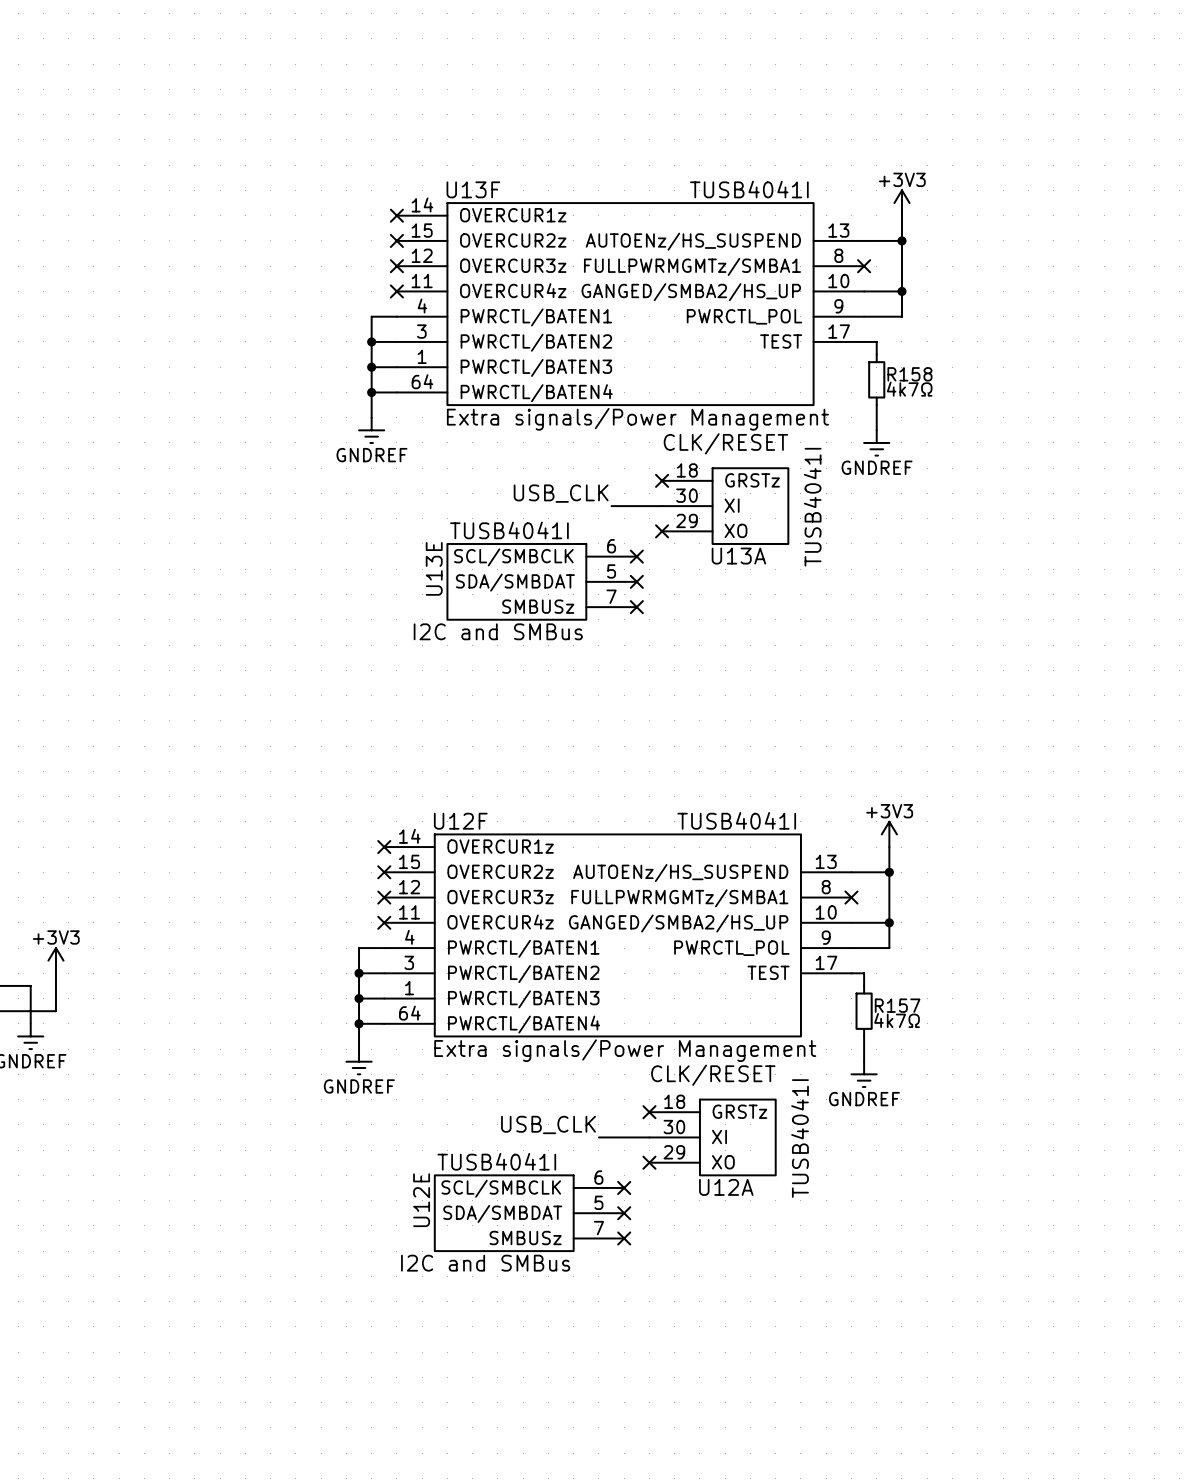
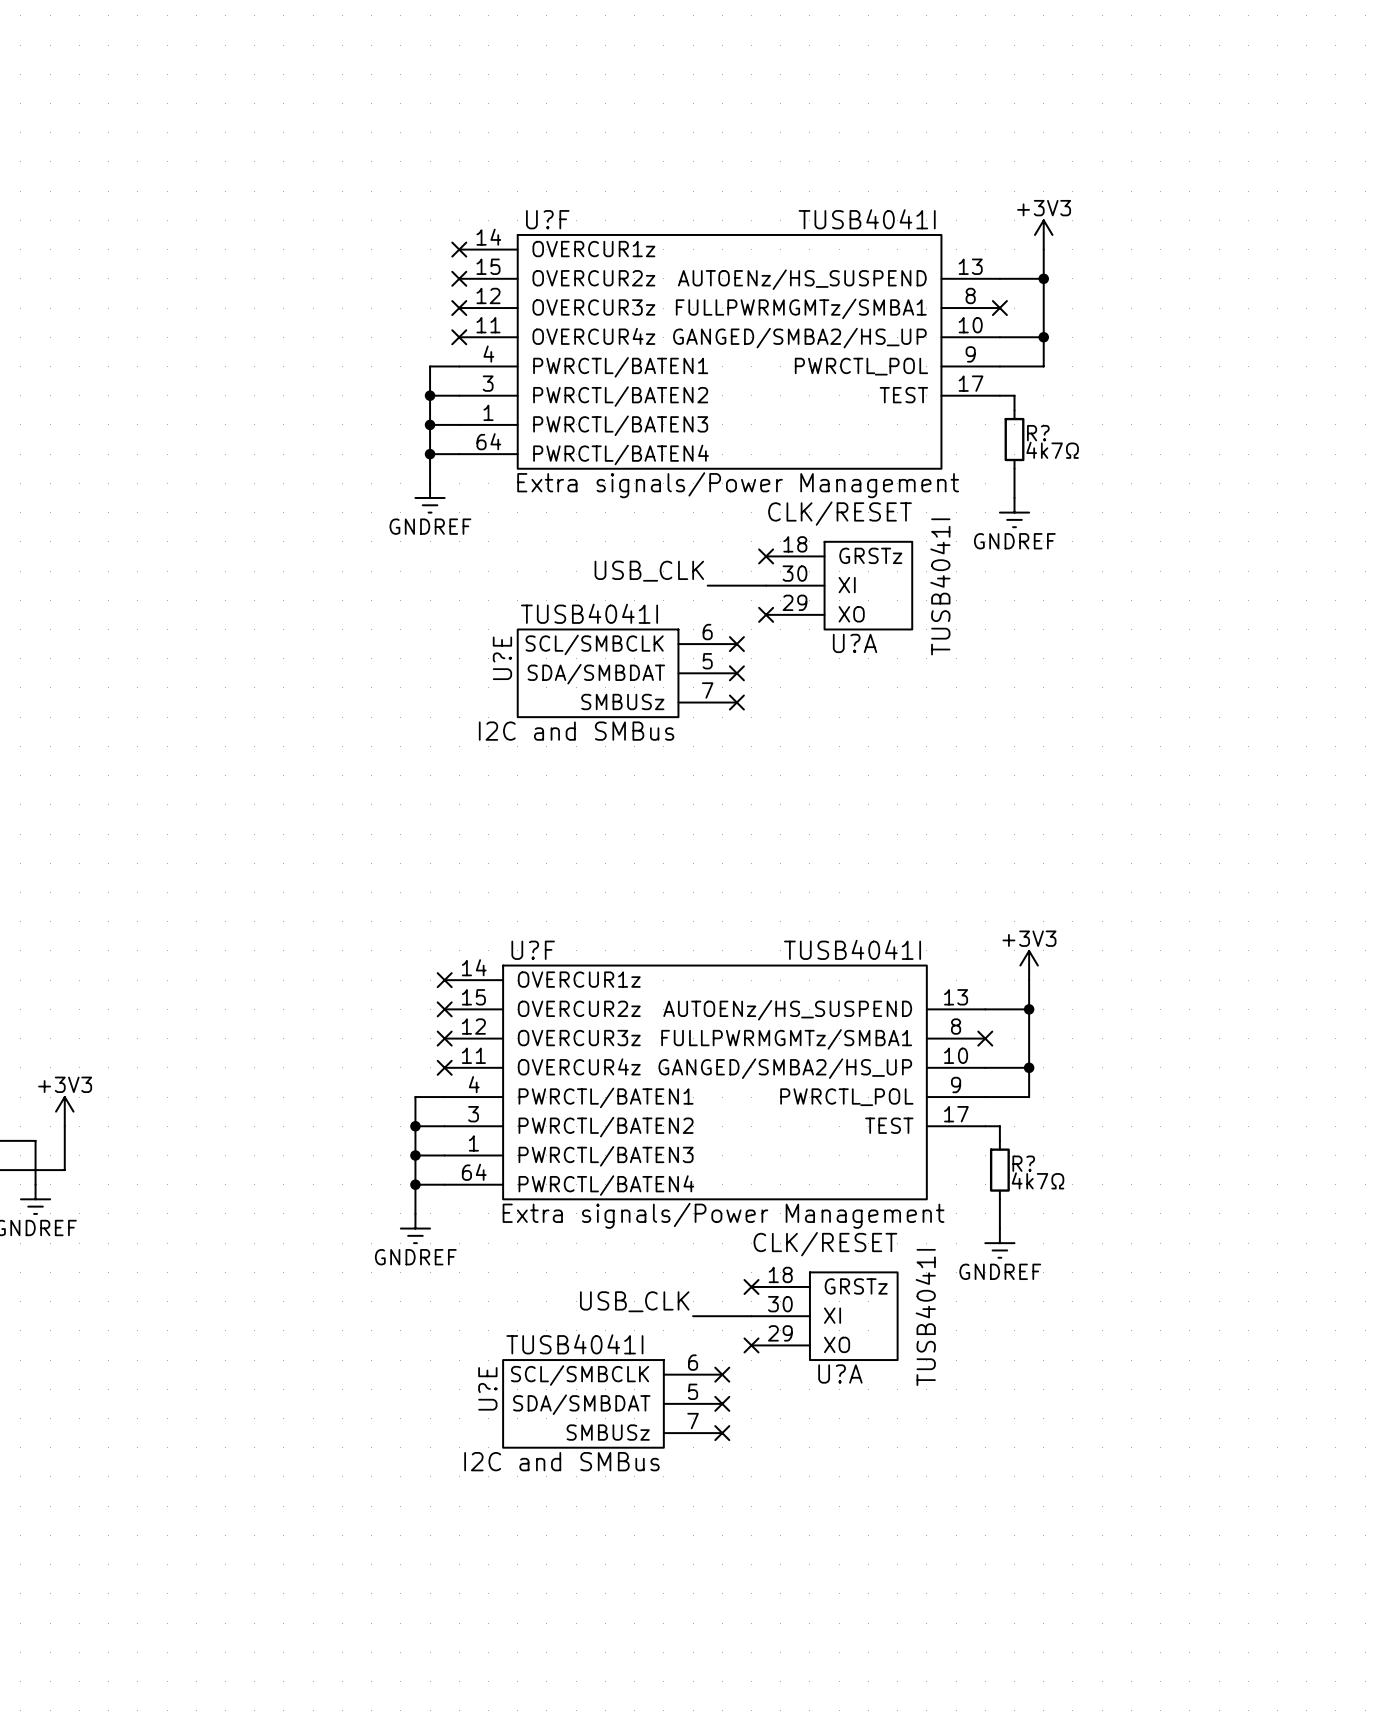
U13F name: U13F (473, 189) -> U?F (547, 219)
R158 name: R158 (909, 374) -> R? (1038, 433)
U13A name: U13A (738, 556) -> U?A (855, 643)
U13E name: U13E (434, 568) -> U?E (502, 658)
U12F name: U12F (460, 821) -> U?F (533, 950)
R157 name: R157 (897, 1005) -> R? (1023, 1163)
U12A name: U12A (726, 1187) -> U?A (840, 1374)
U12E name: U12E (421, 1200) -> U?E (487, 1388)

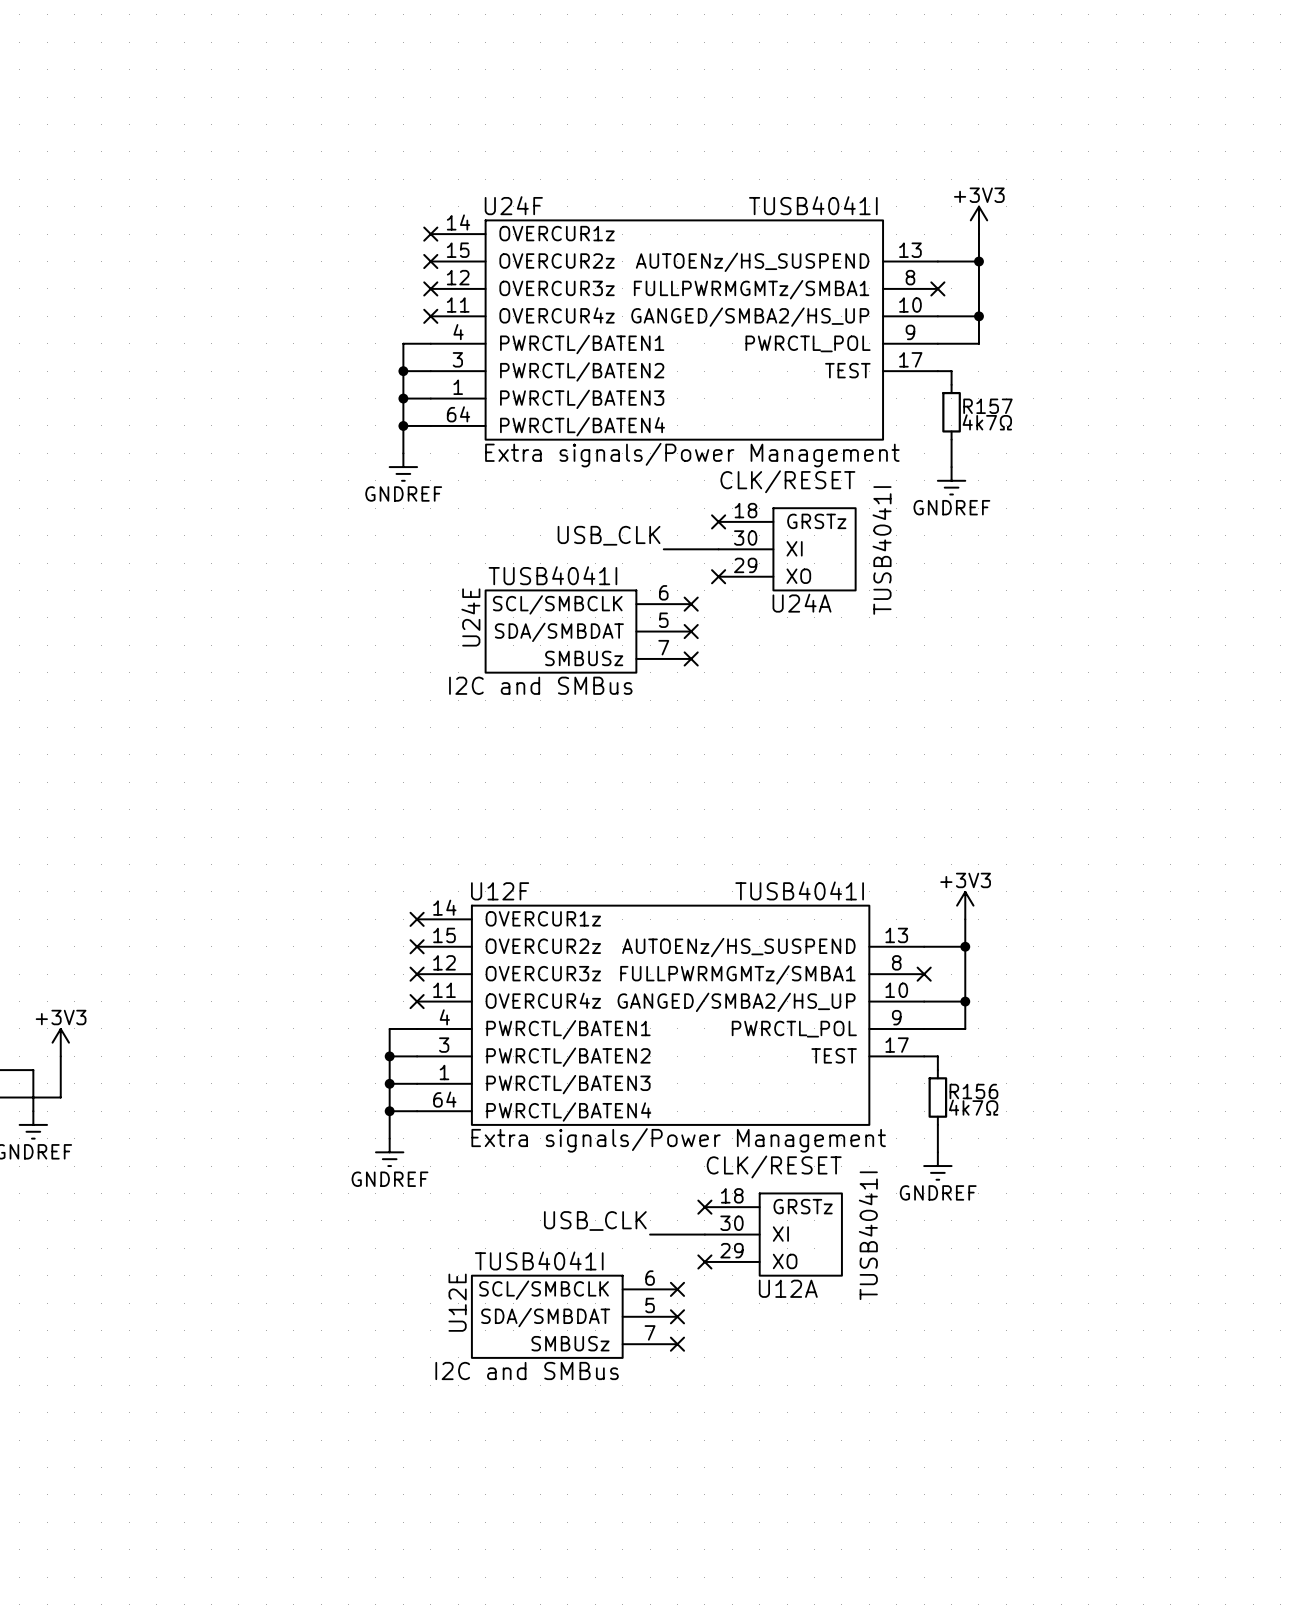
U?F name: U?F (547, 219) -> U24F (513, 205)
R? name: R? (1038, 433) -> R157 (987, 406)
U?A name: U?A (855, 643) -> U24A (801, 603)
U?E name: U?E (502, 658) -> U24E (470, 617)
U?F name: U?F (533, 950) -> U12F (500, 891)
R? name: R? (1023, 1163) -> R156 (973, 1091)
U?A name: U?A (840, 1374) -> U12A (788, 1288)
U?E name: U?E (487, 1388) -> U12E (457, 1302)

